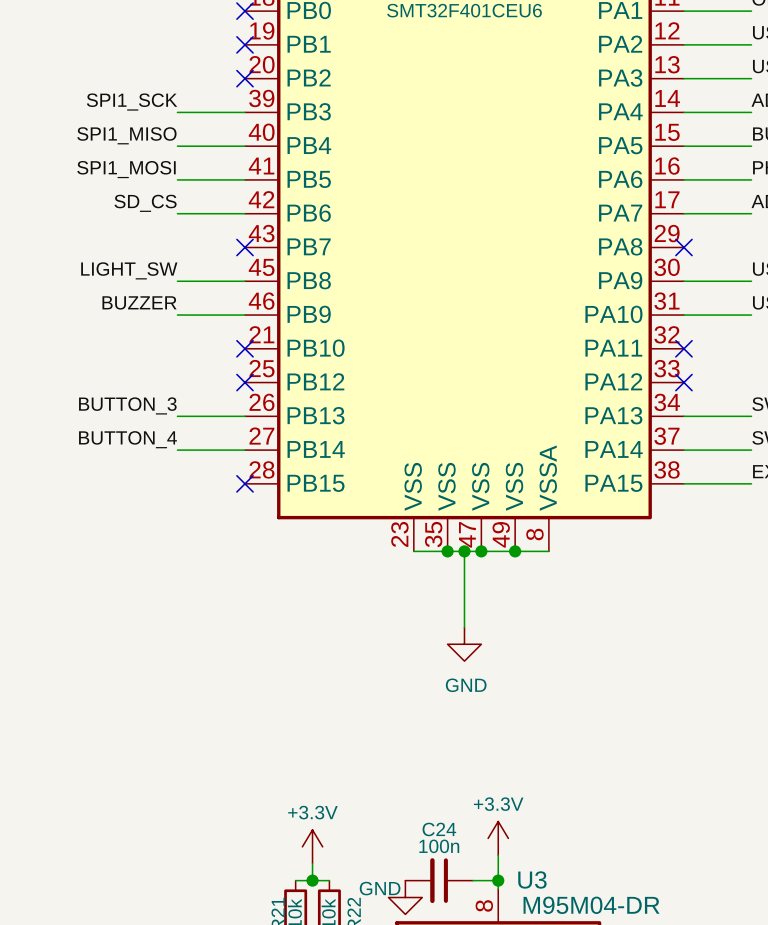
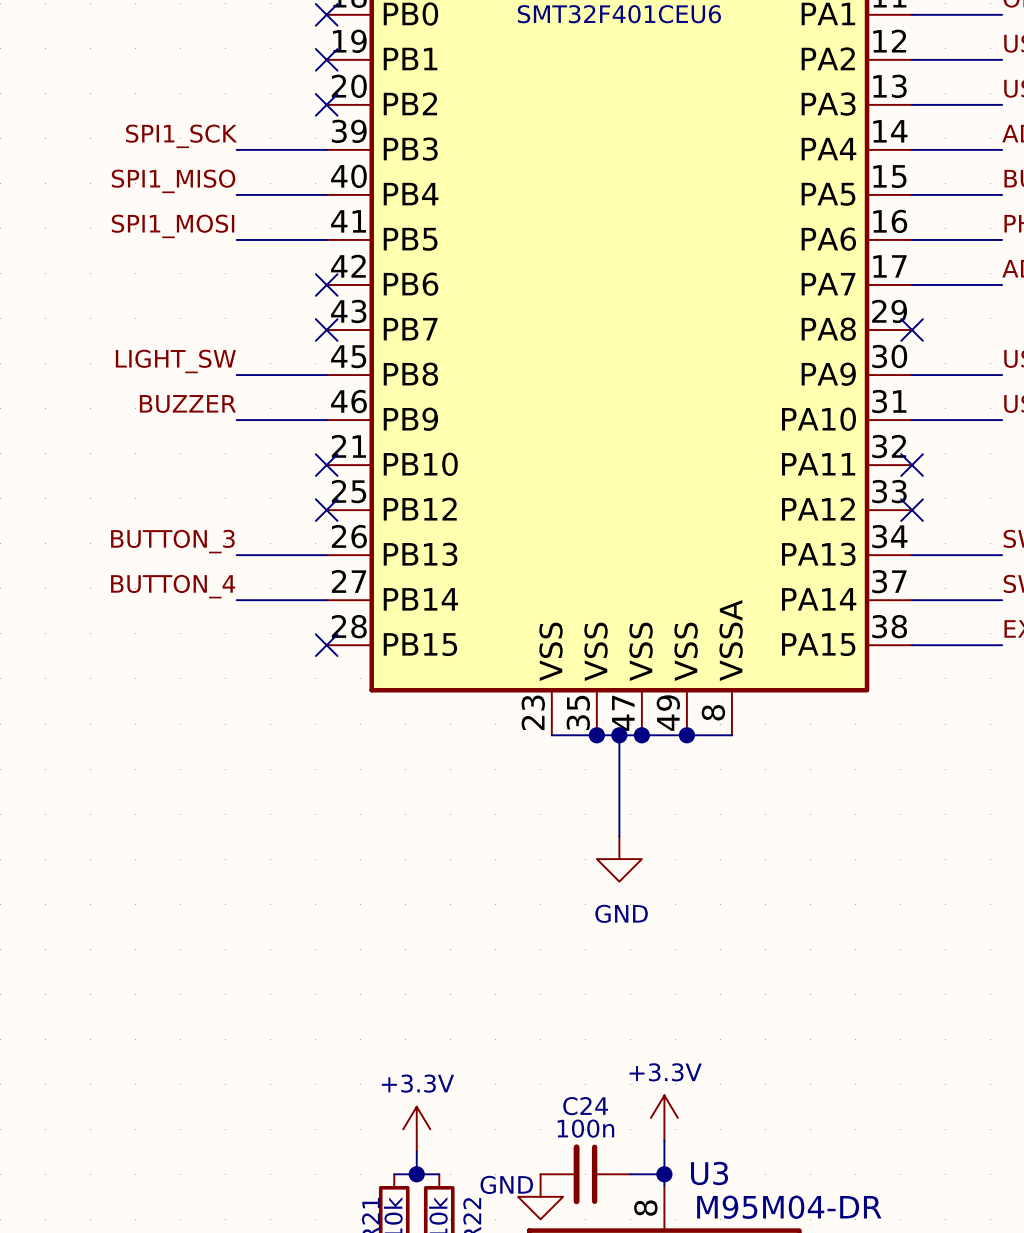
label: SD_CS (145, 203) -> none
wire: (177, 213) (244, 213) -> none
no-connect mark: none -> (326, 285)

